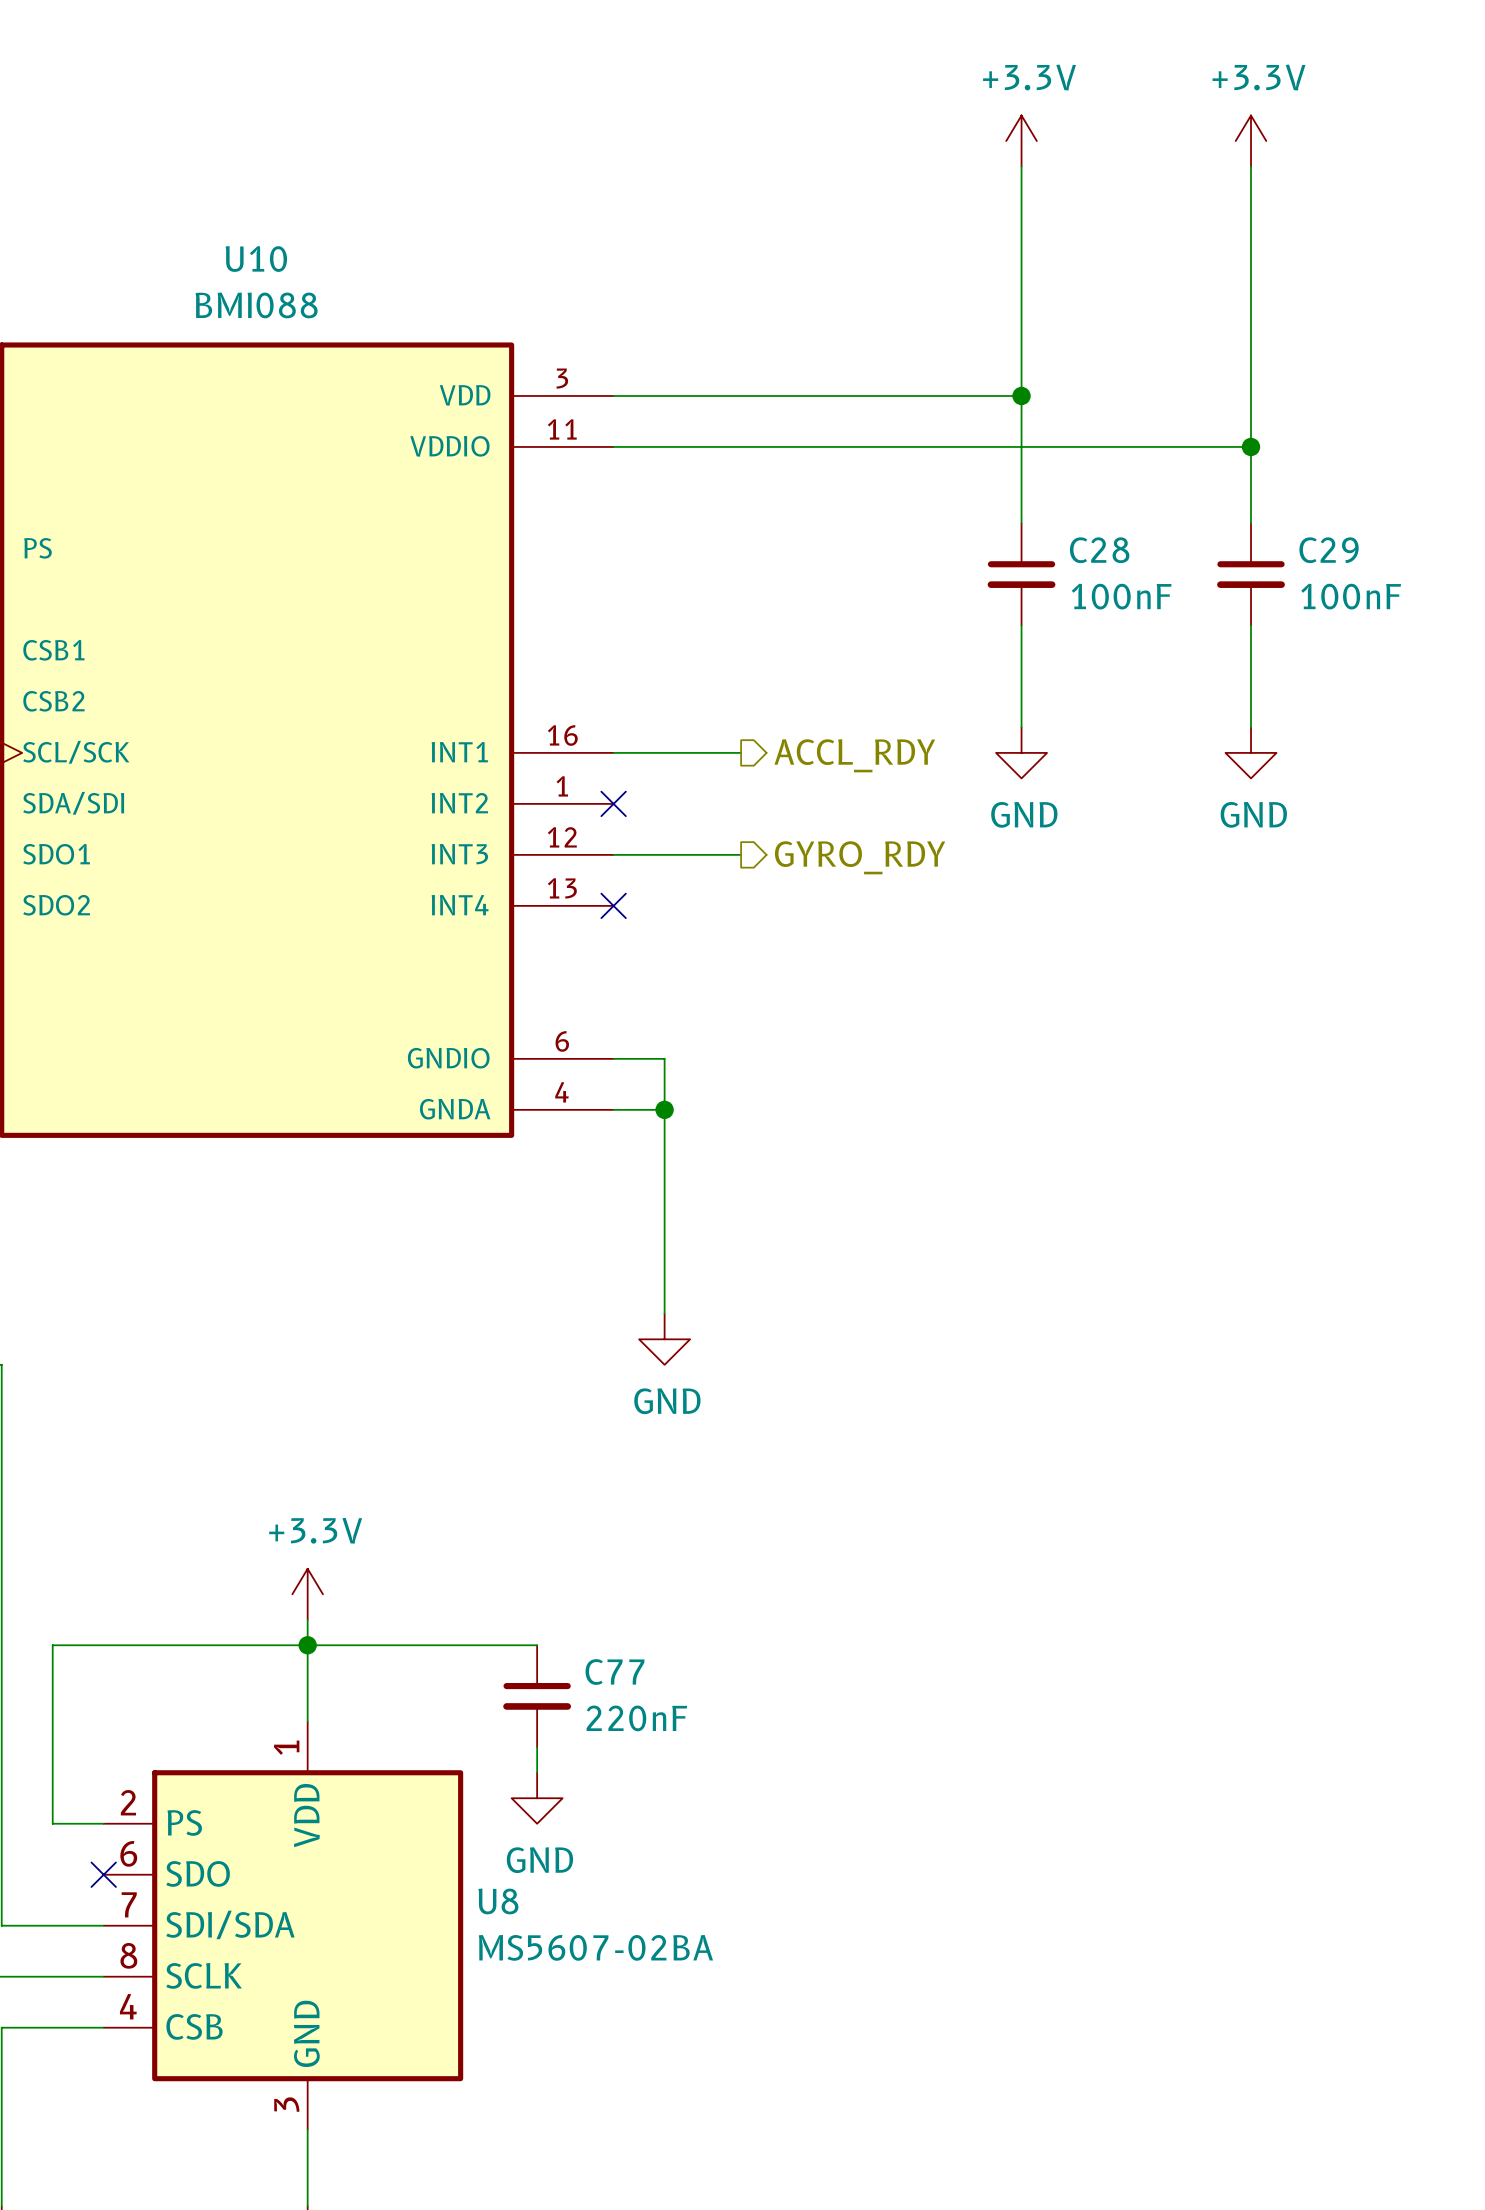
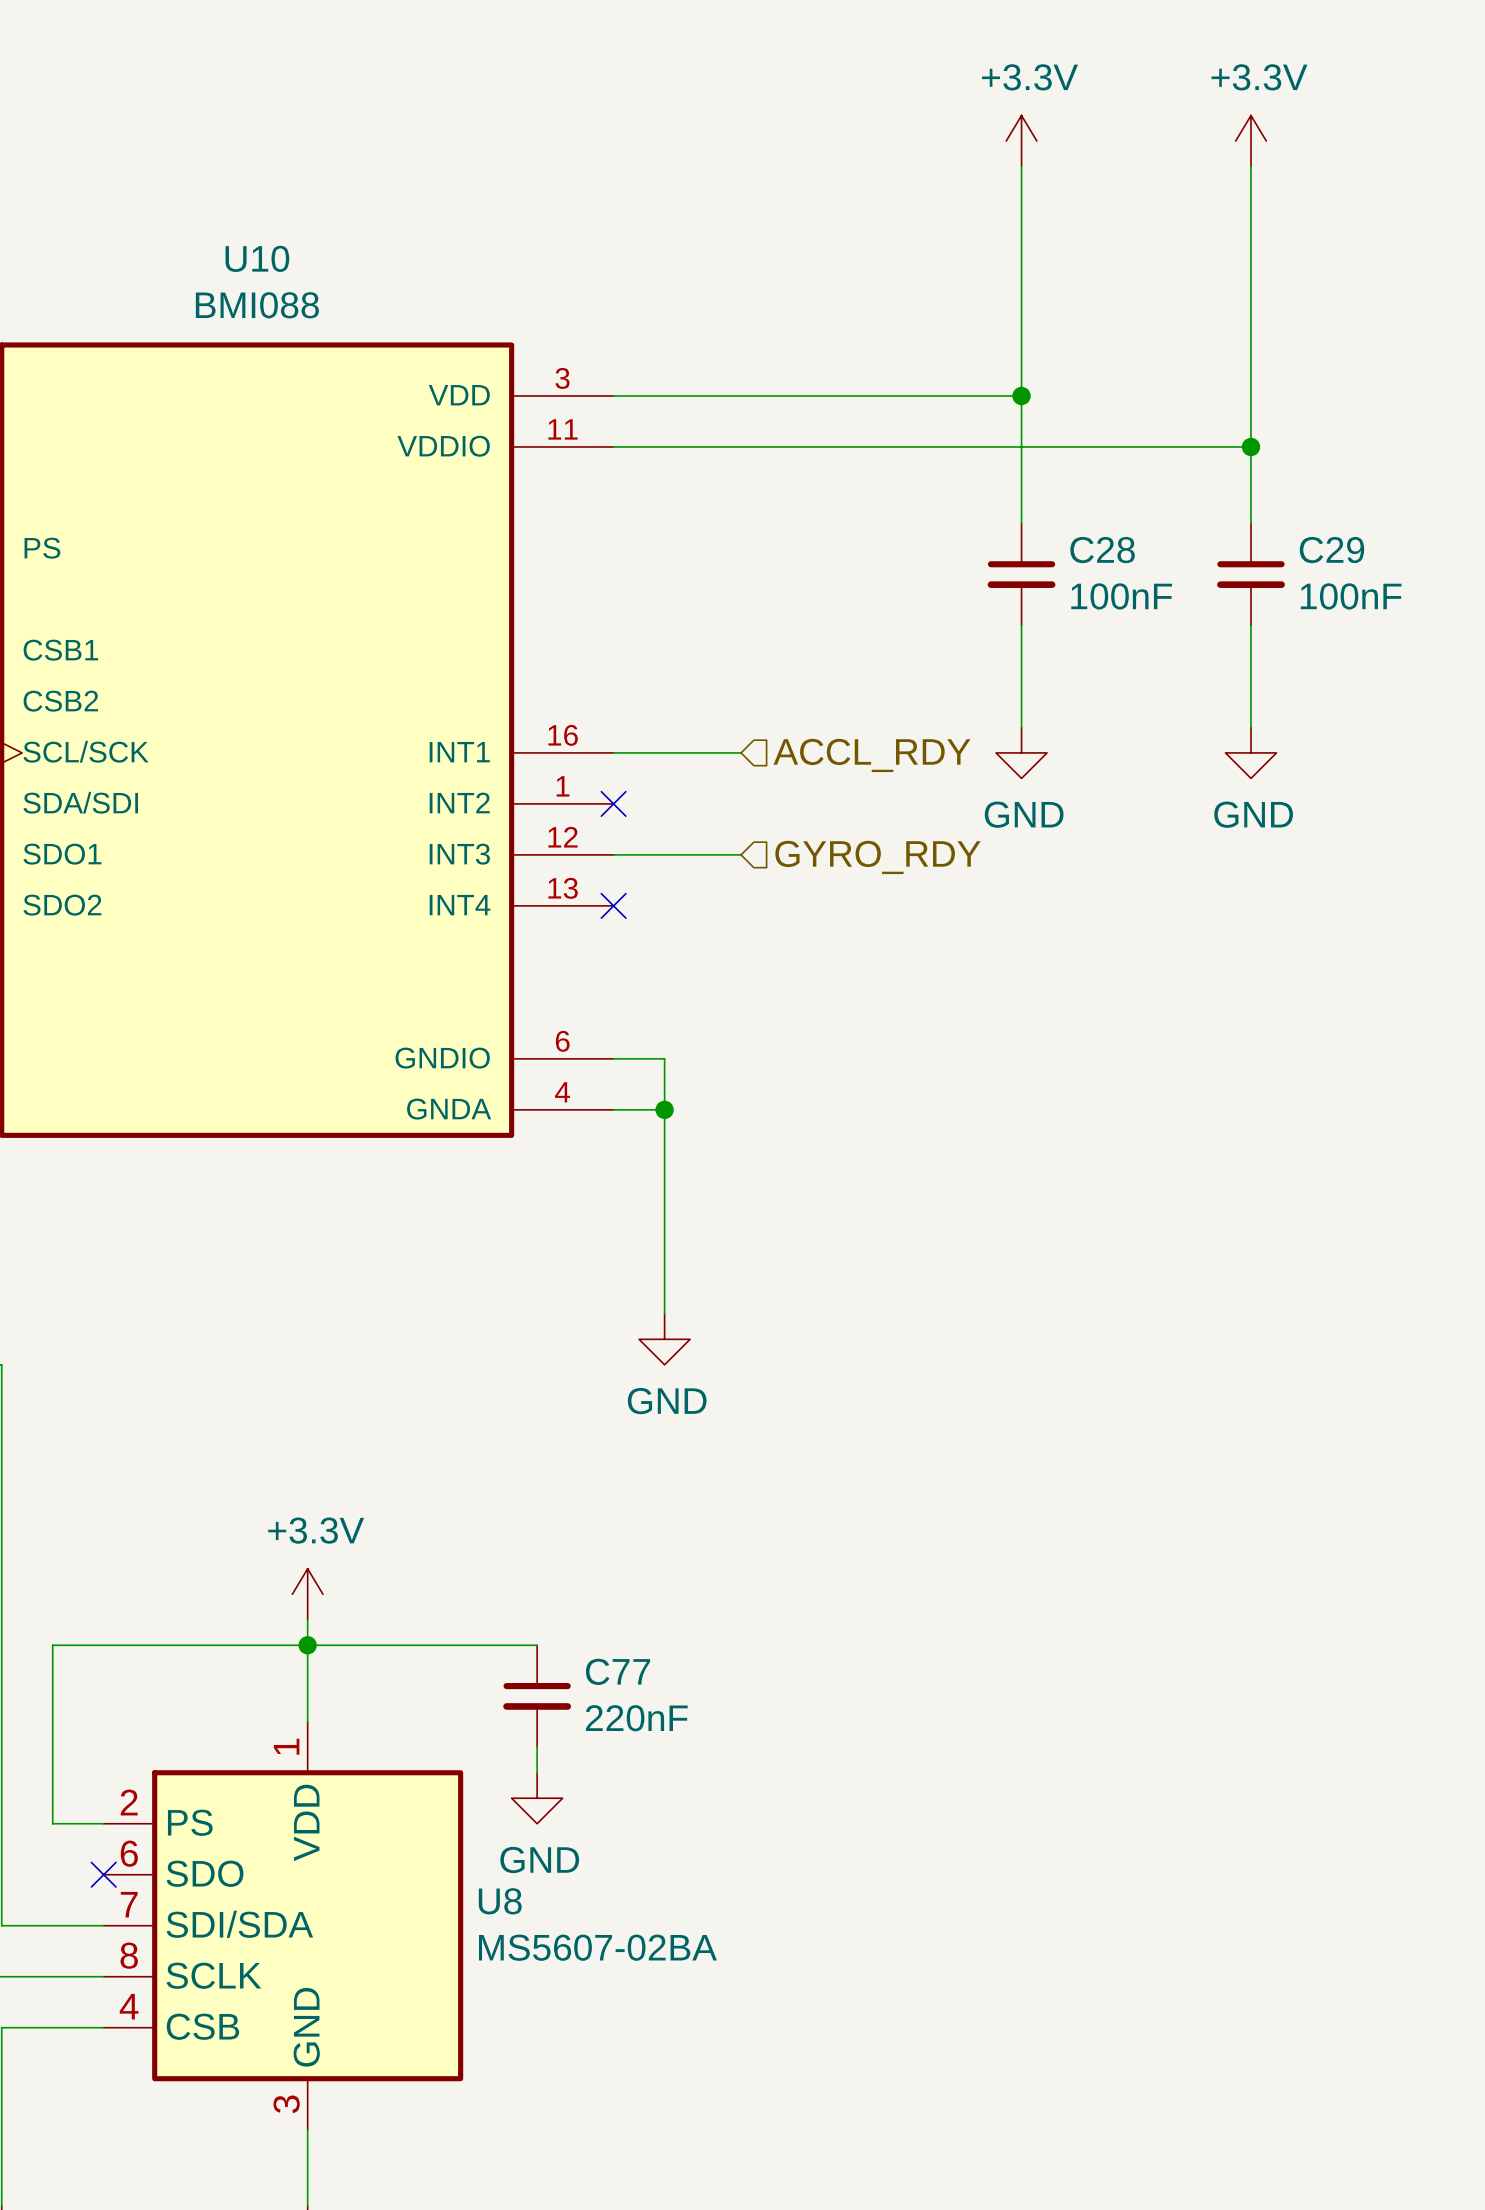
hierarchical label shape: output (854, 755) -> input (871, 755)
hierarchical label shape: output (860, 857) -> input (877, 857)

